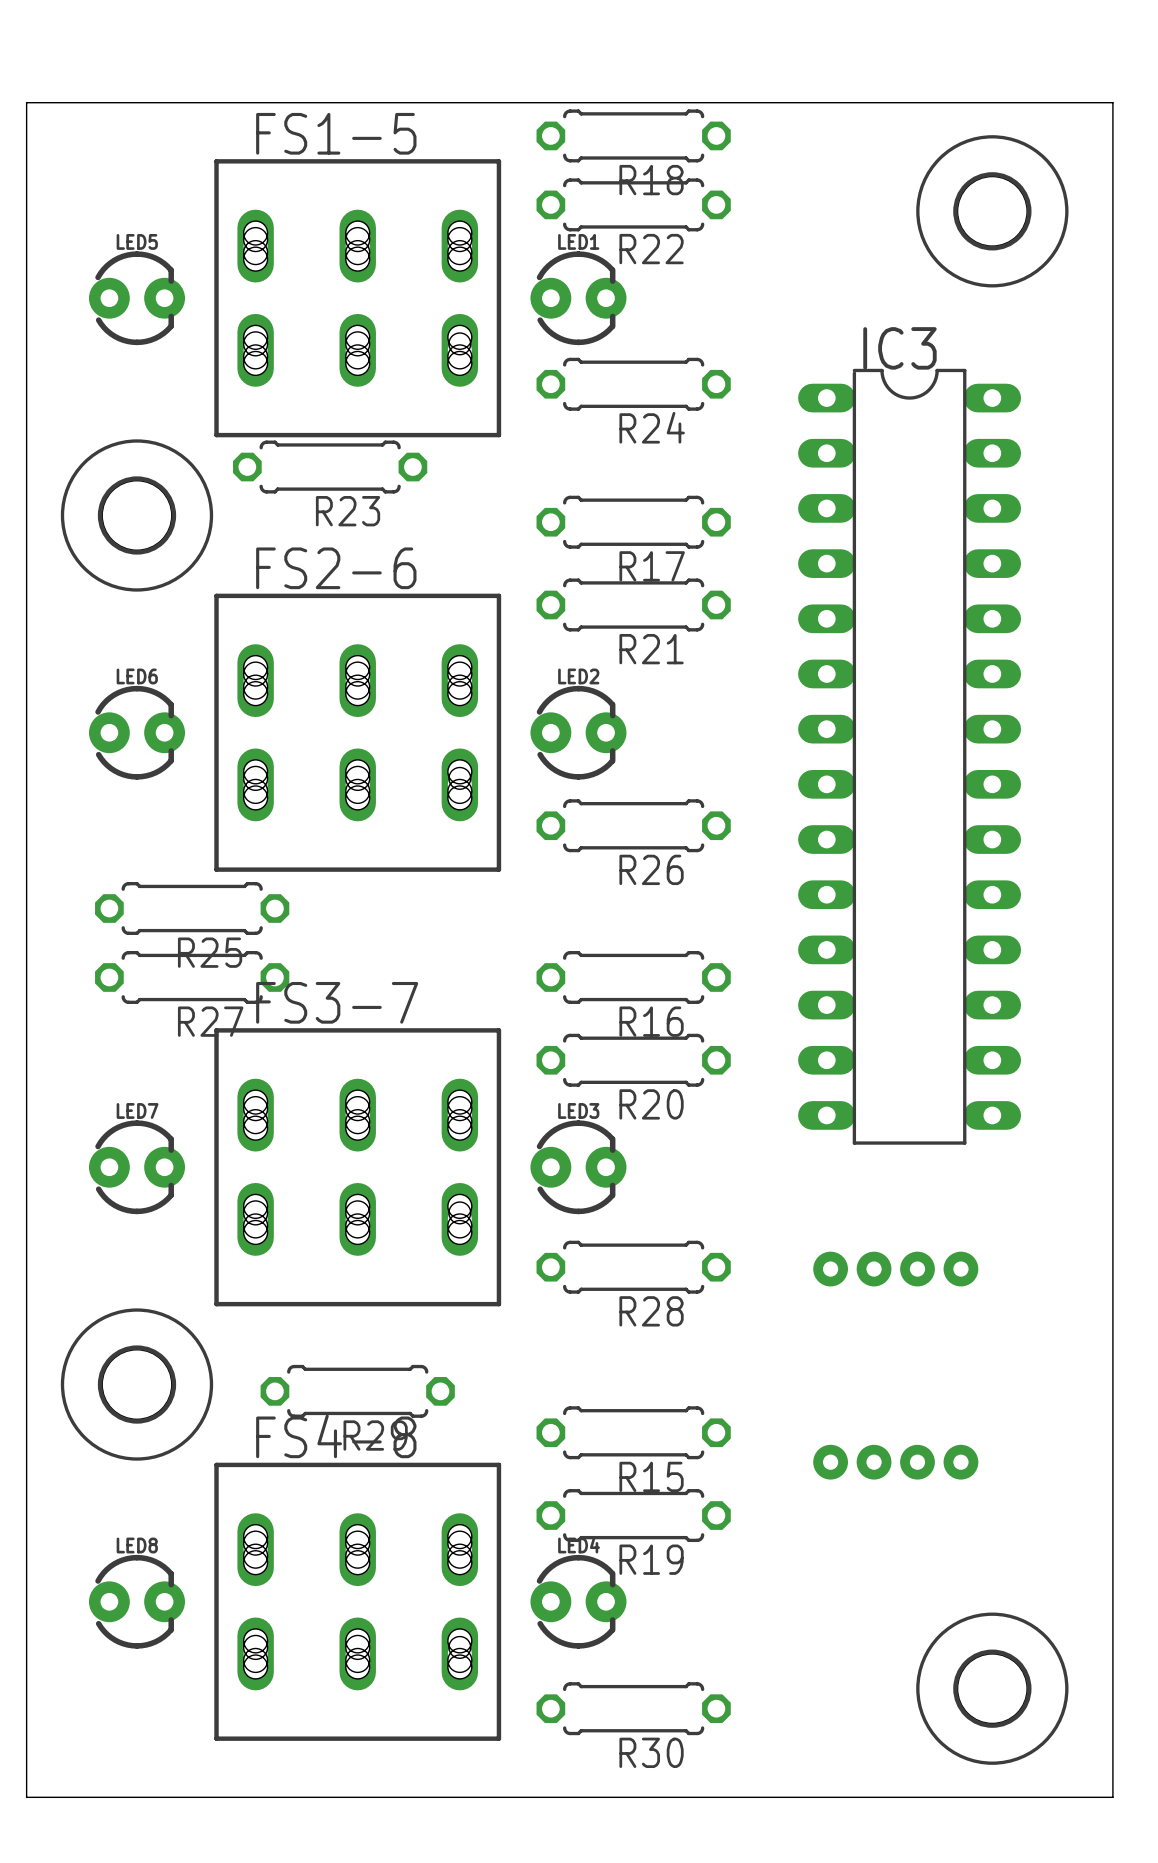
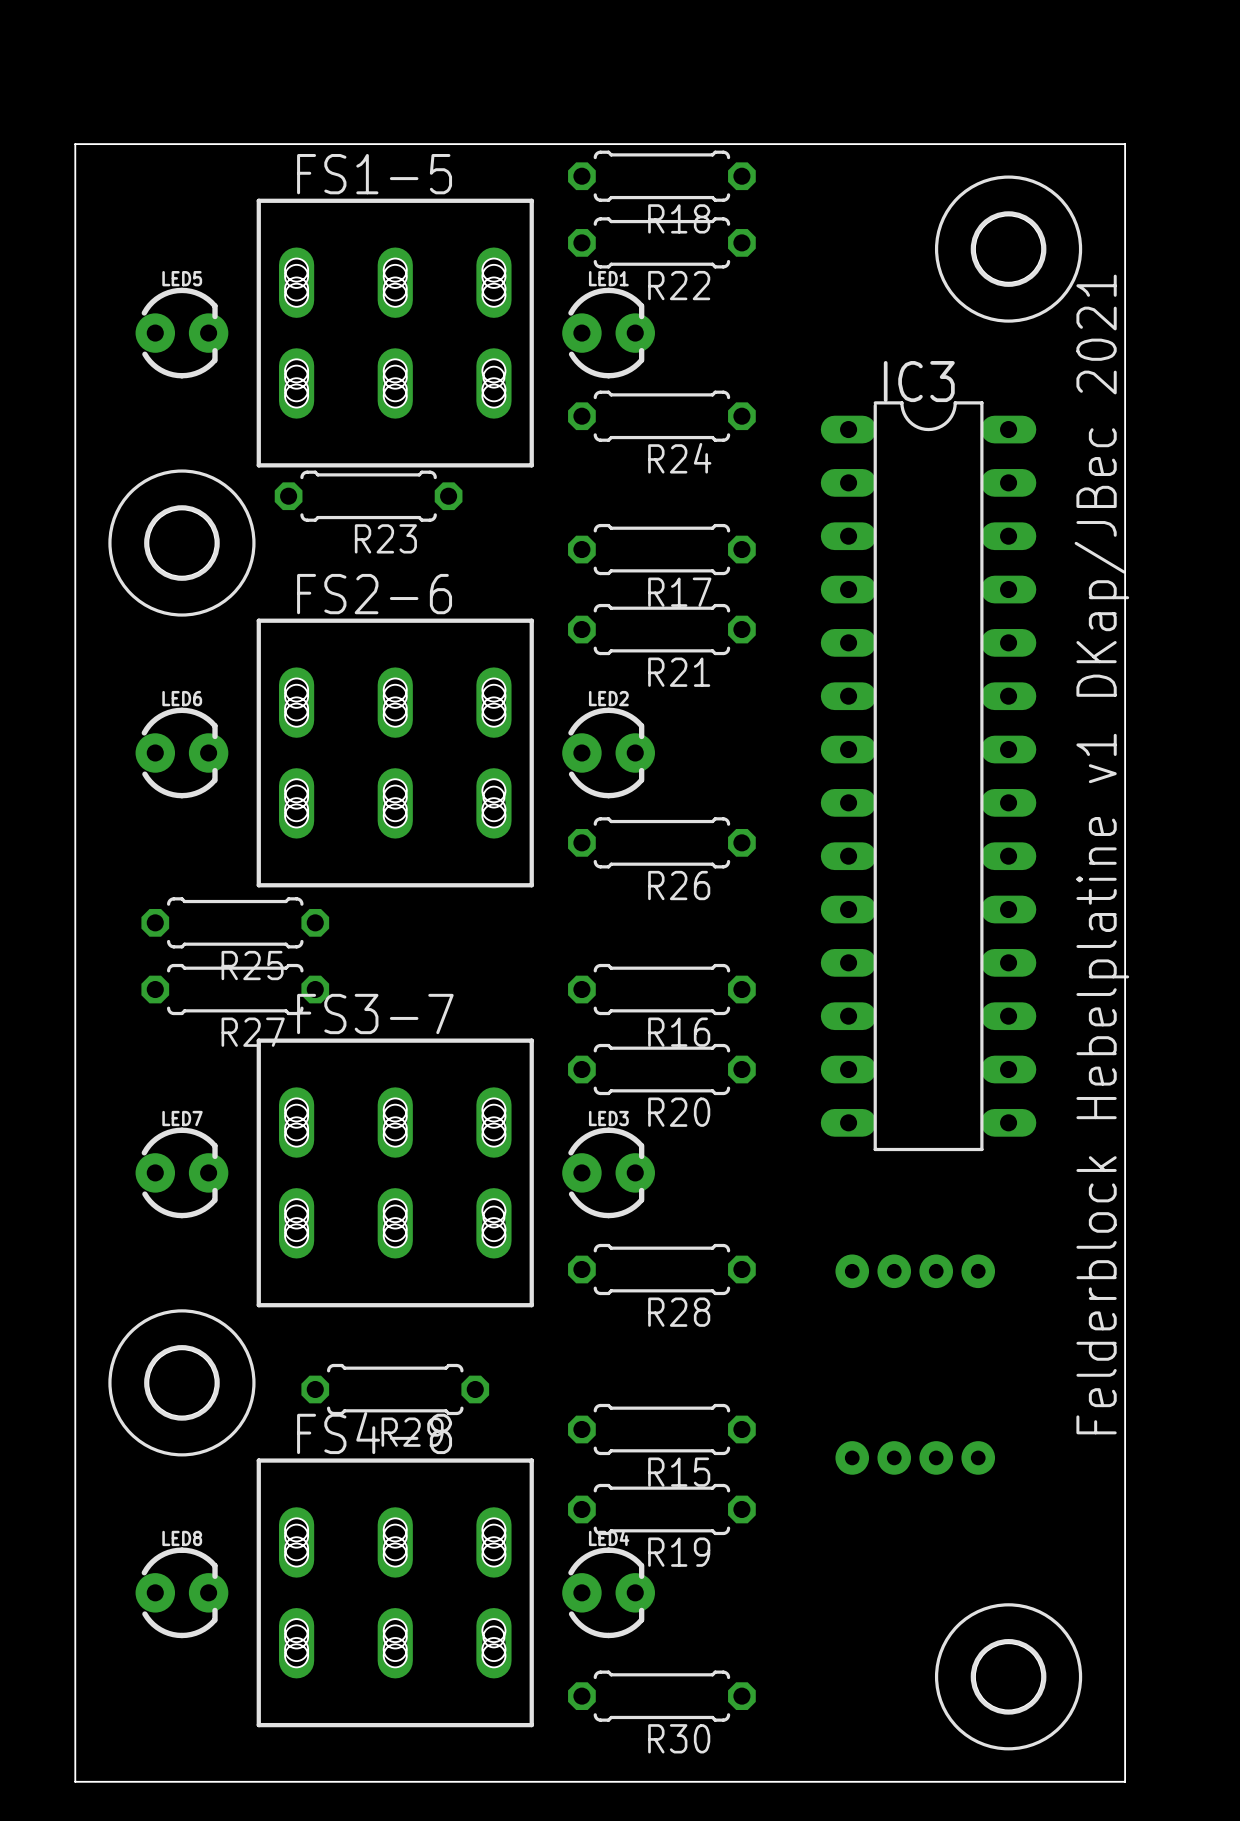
text: none -> Felderblock Hebelplatine v1 DKap/JBec 2021 (1101, 854)

